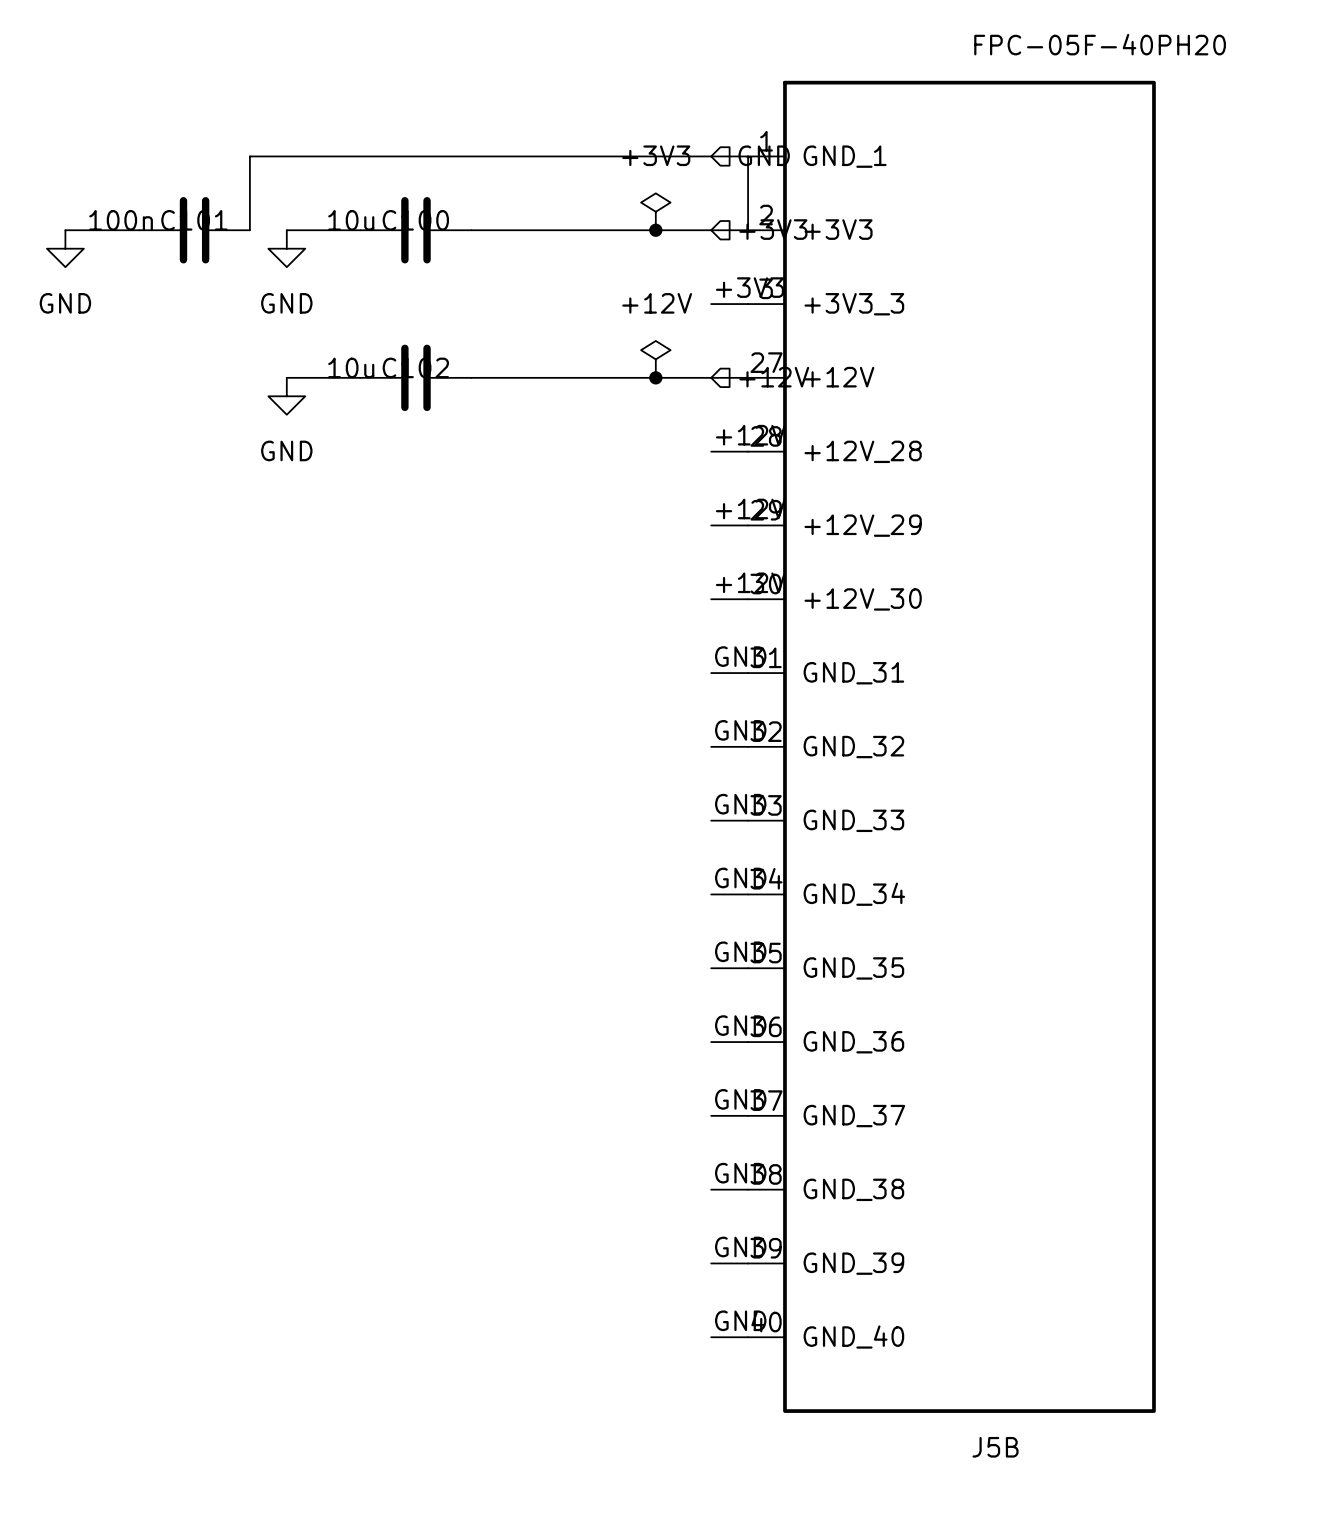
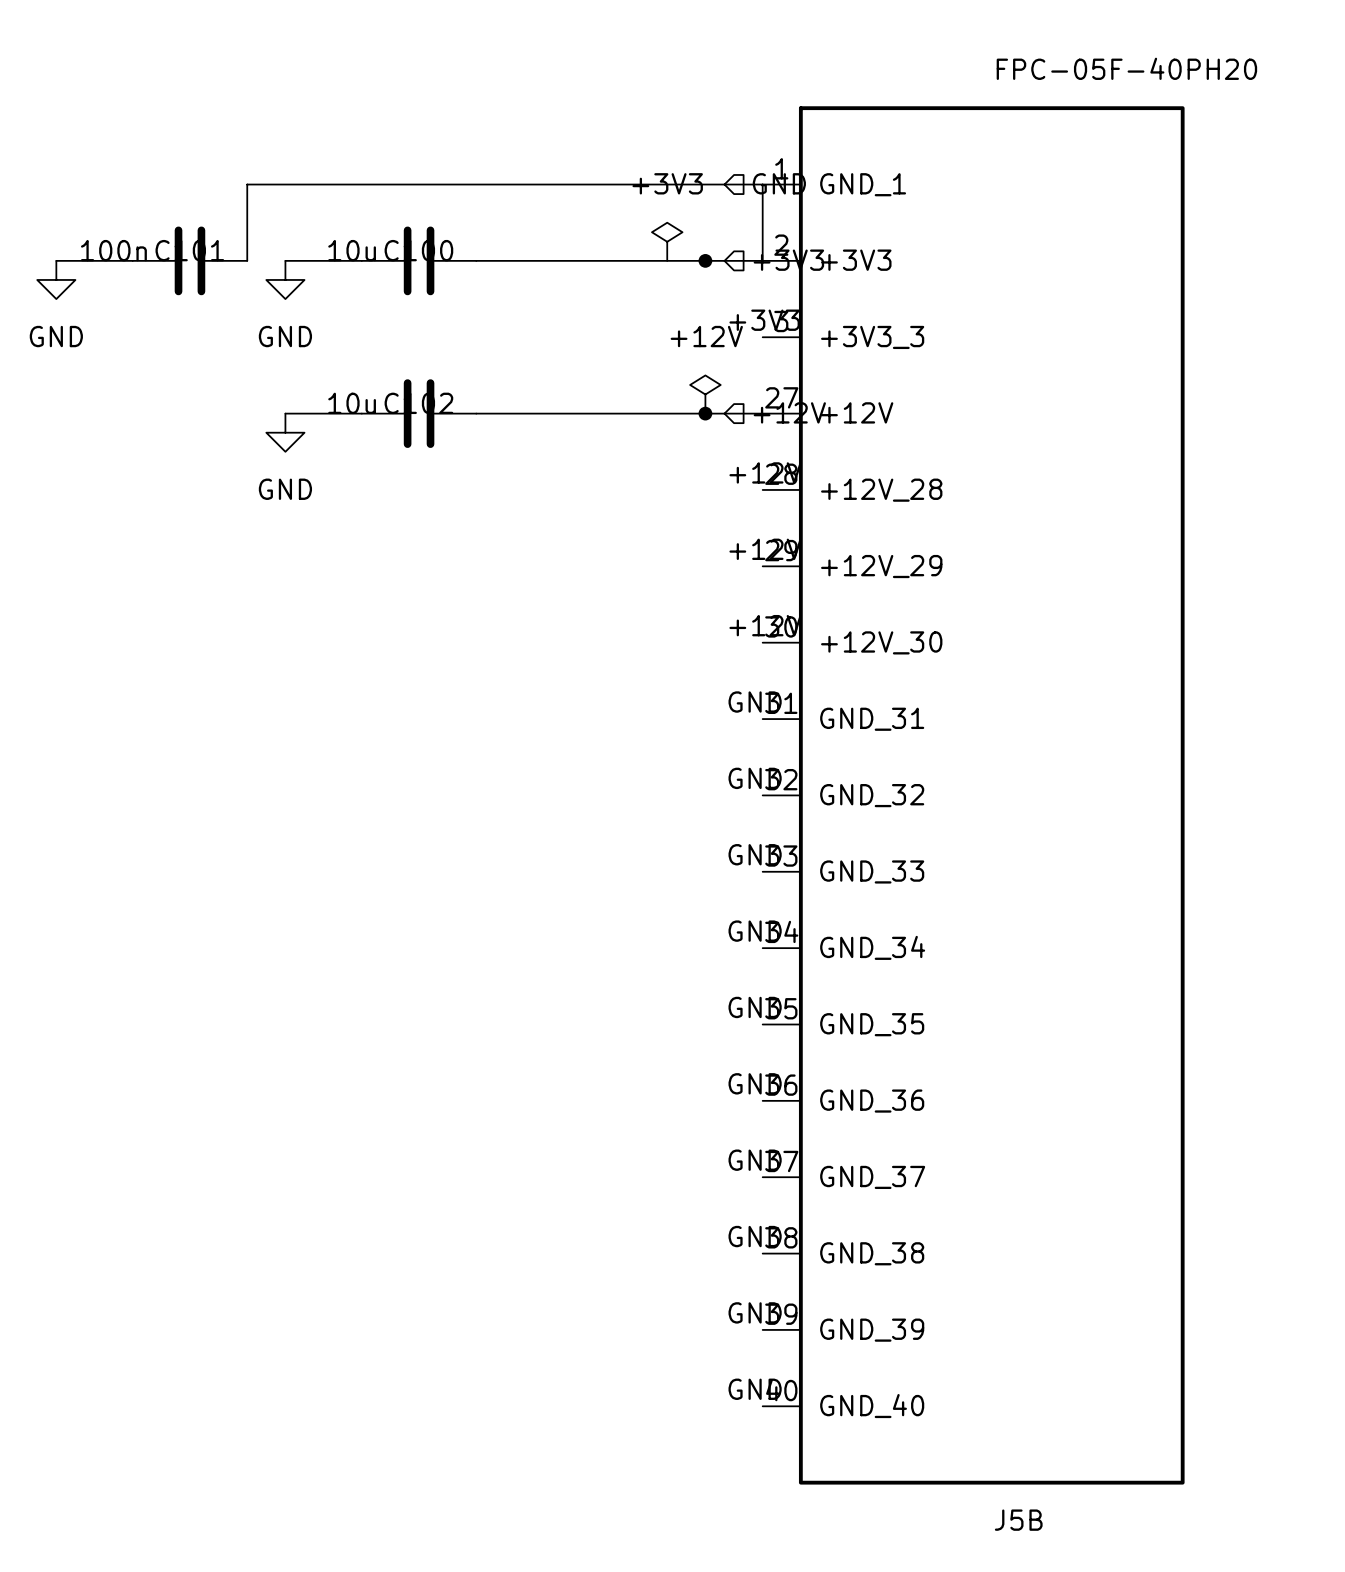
junction position: (655, 230) -> (705, 260)
wire: (711, 304) (748, 304) -> none
power symbol position: +12V (655, 359) -> +12V (705, 394)
junction position: (655, 377) -> (705, 413)
wire: (711, 451) (748, 451) -> none
wire: (711, 525) (748, 525) -> none
wire: (711, 599) (748, 599) -> none
wire: (711, 673) (748, 673) -> none
wire: (711, 746) (748, 746) -> none
wire: (711, 820) (748, 820) -> none
wire: (711, 894) (748, 894) -> none
wire: (711, 968) (748, 968) -> none
wire: (711, 1042) (748, 1042) -> none
wire: (711, 1115) (748, 1115) -> none
wire: (711, 1189) (748, 1189) -> none
wire: (711, 1263) (748, 1263) -> none
wire: (711, 1337) (748, 1337) -> none

